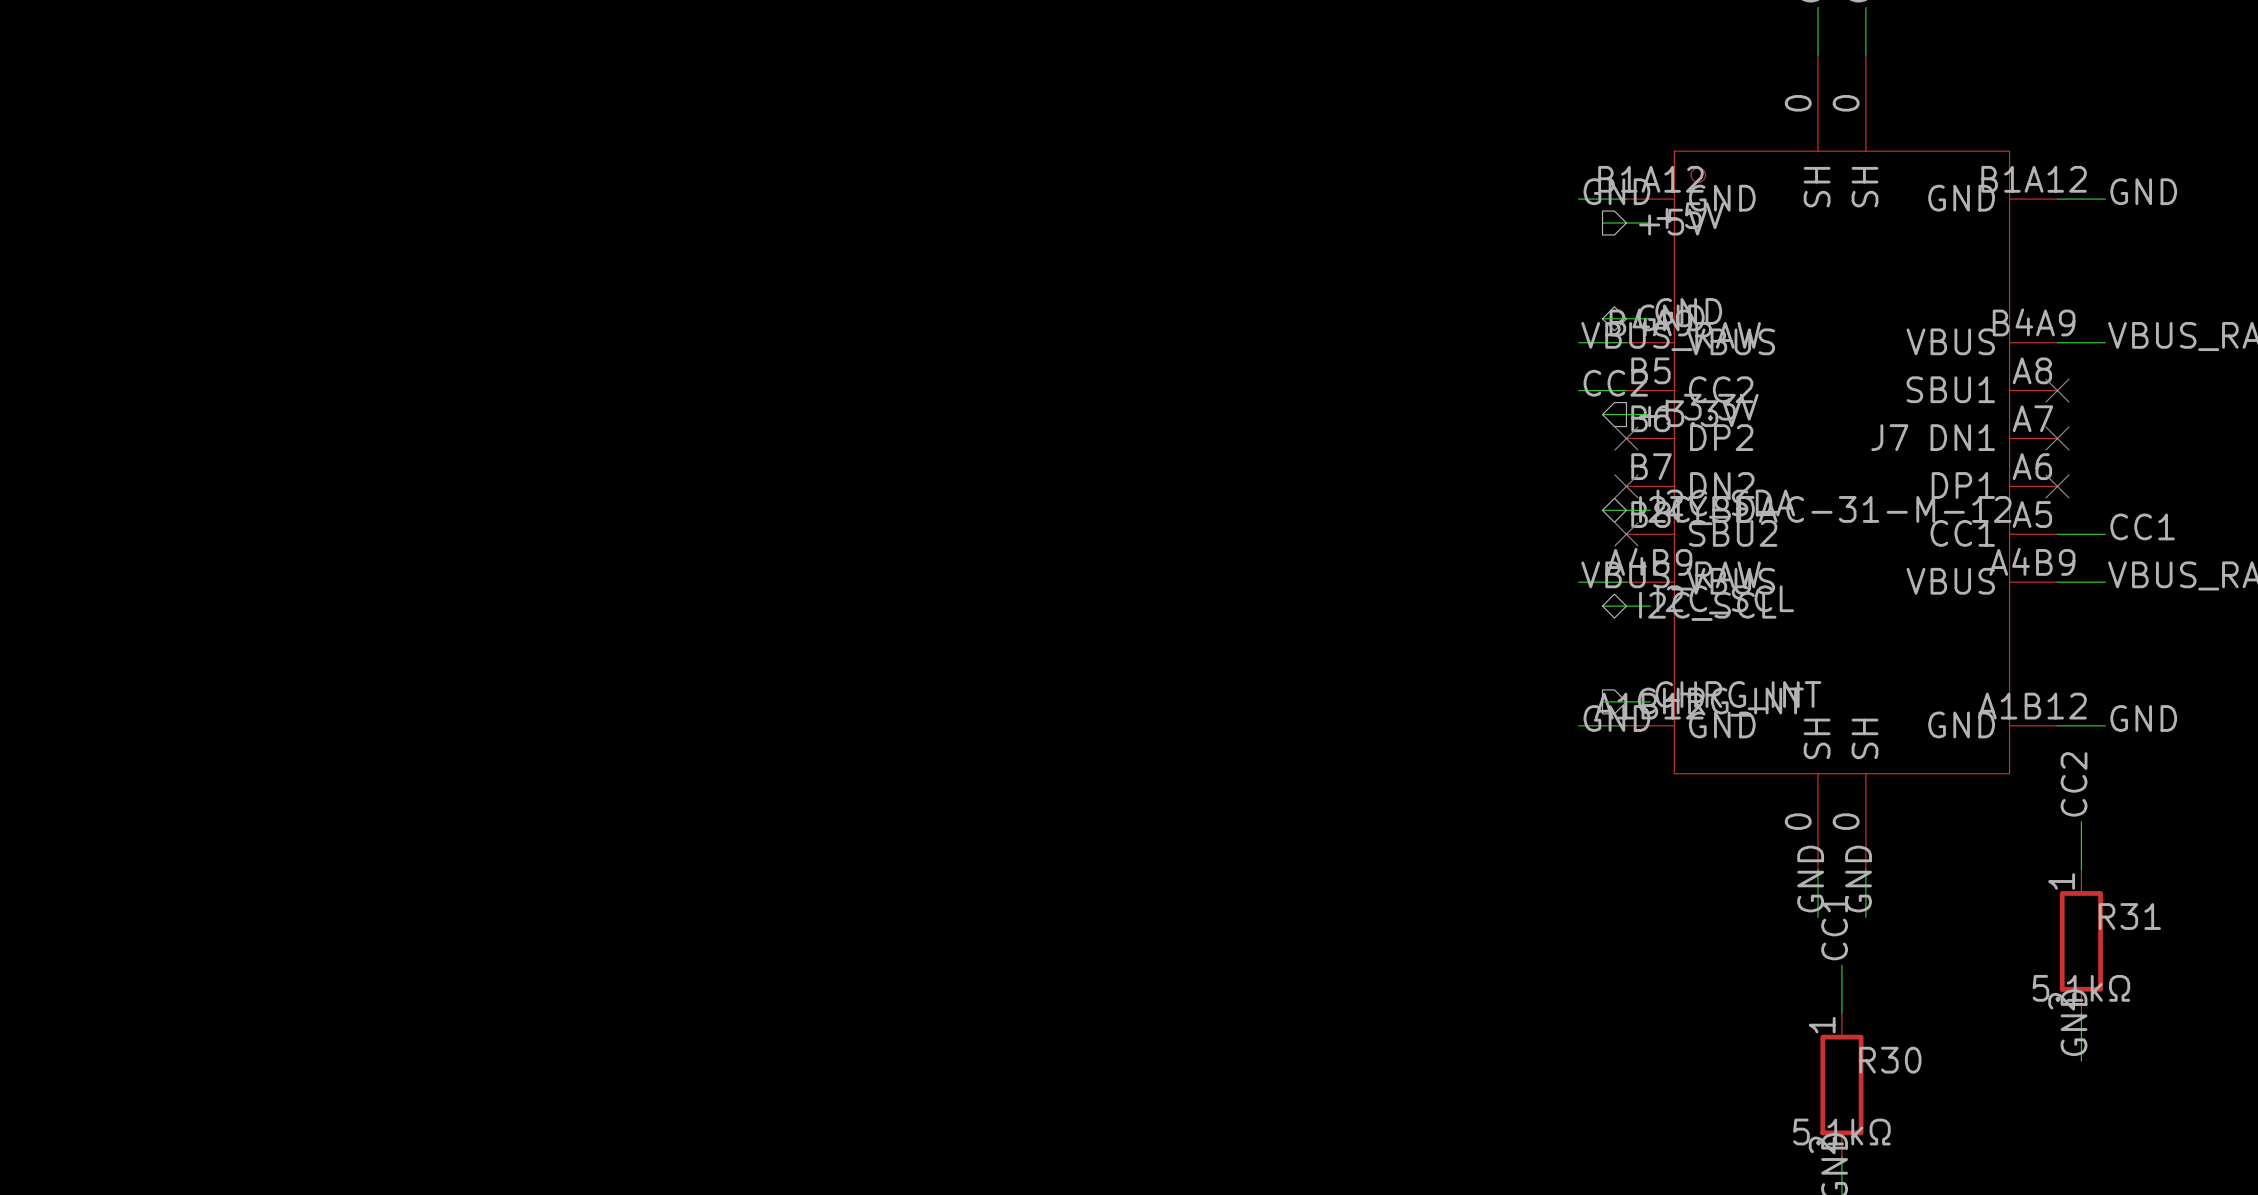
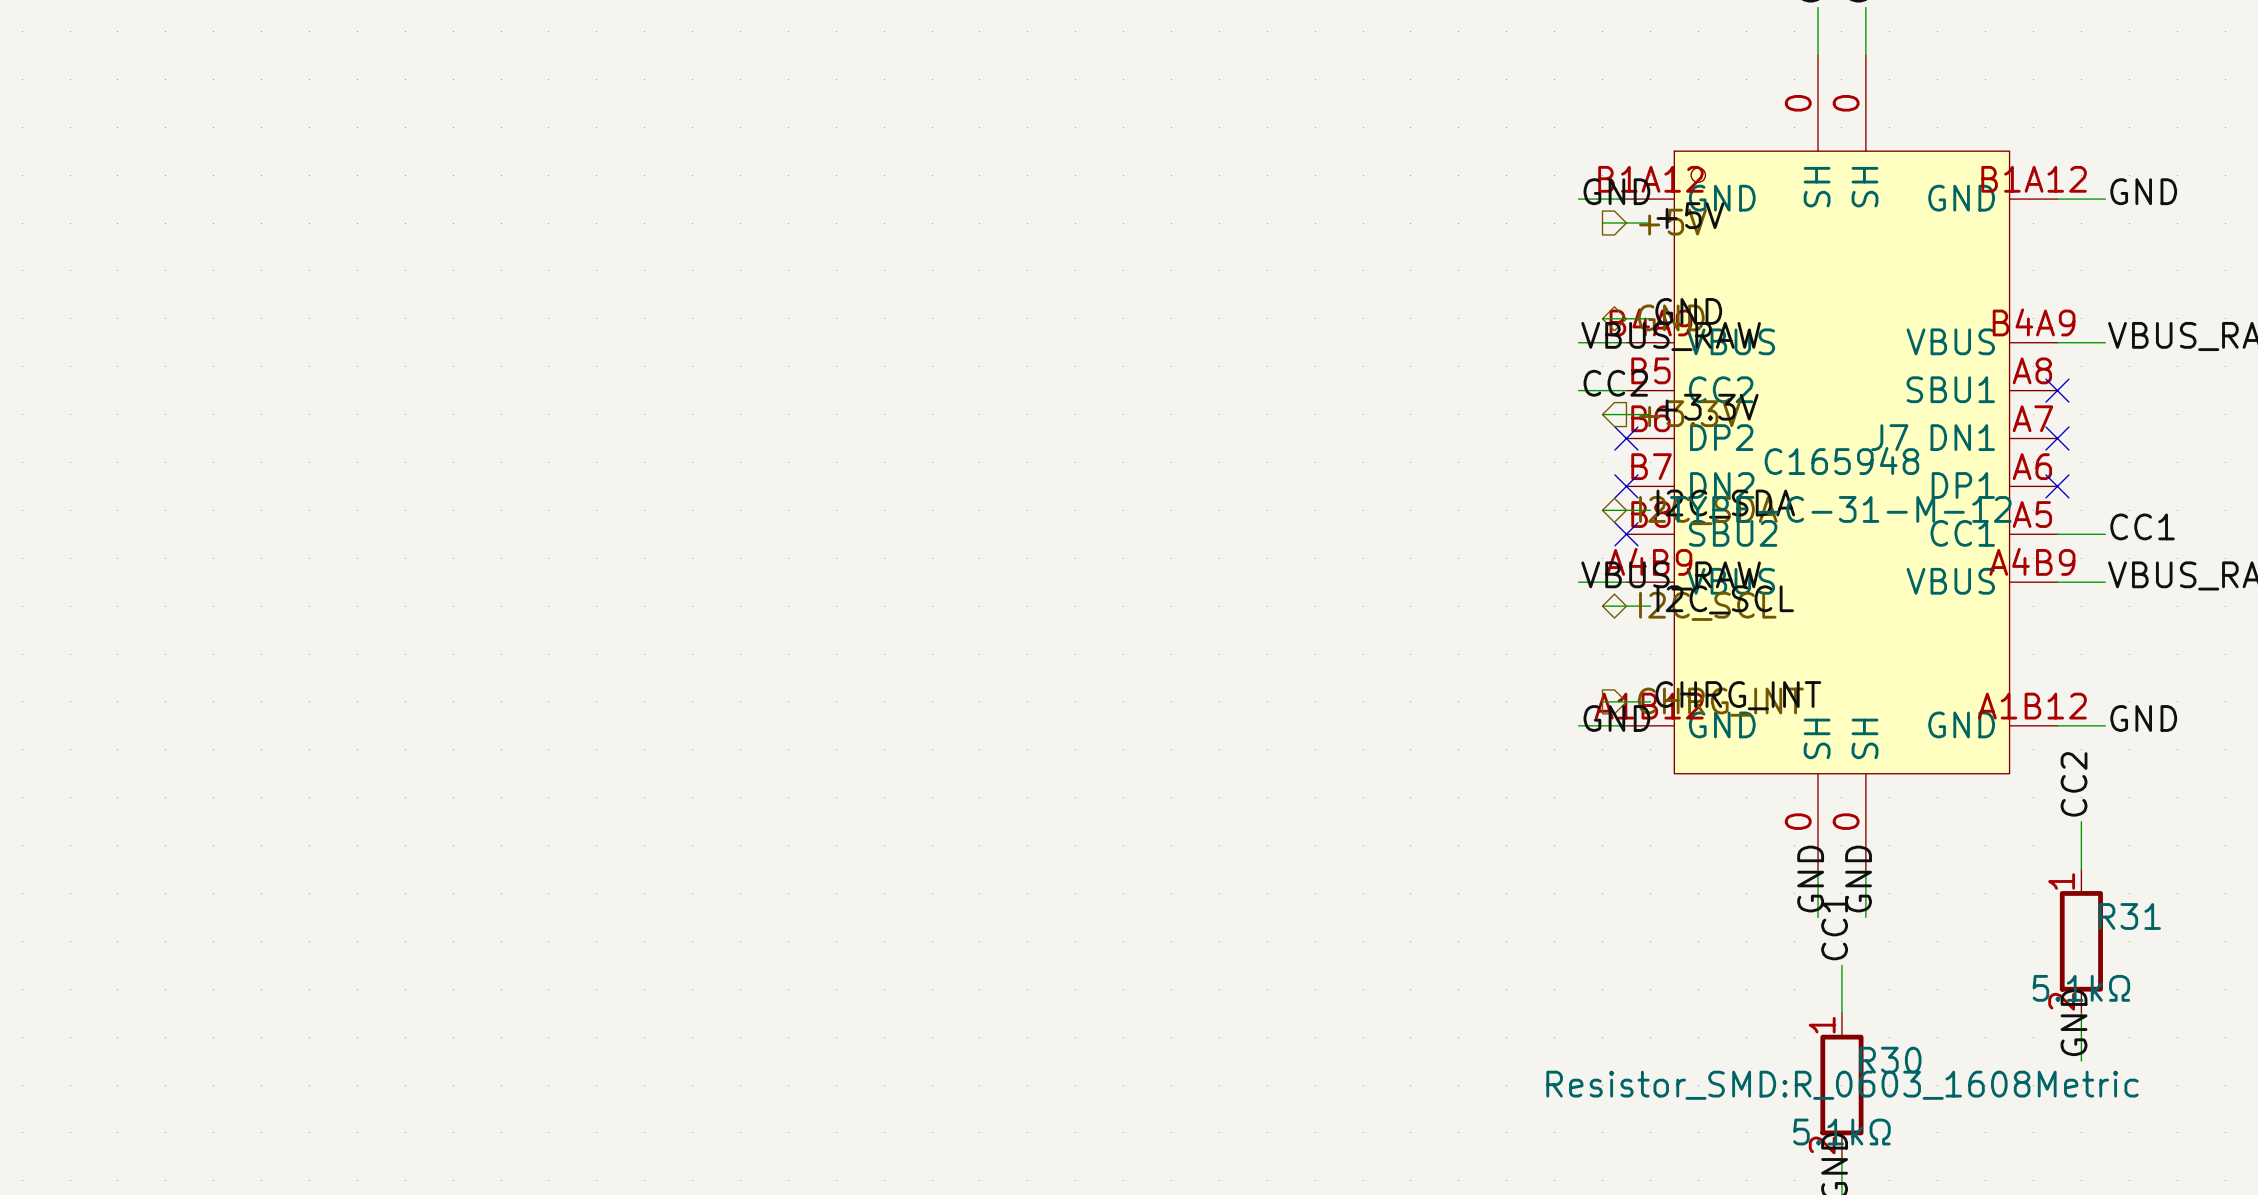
J7 text: none -> C165948 (1841, 460)
R30 text: none -> Resistor_SMD:R_0603_1608Metric (1842, 1085)

